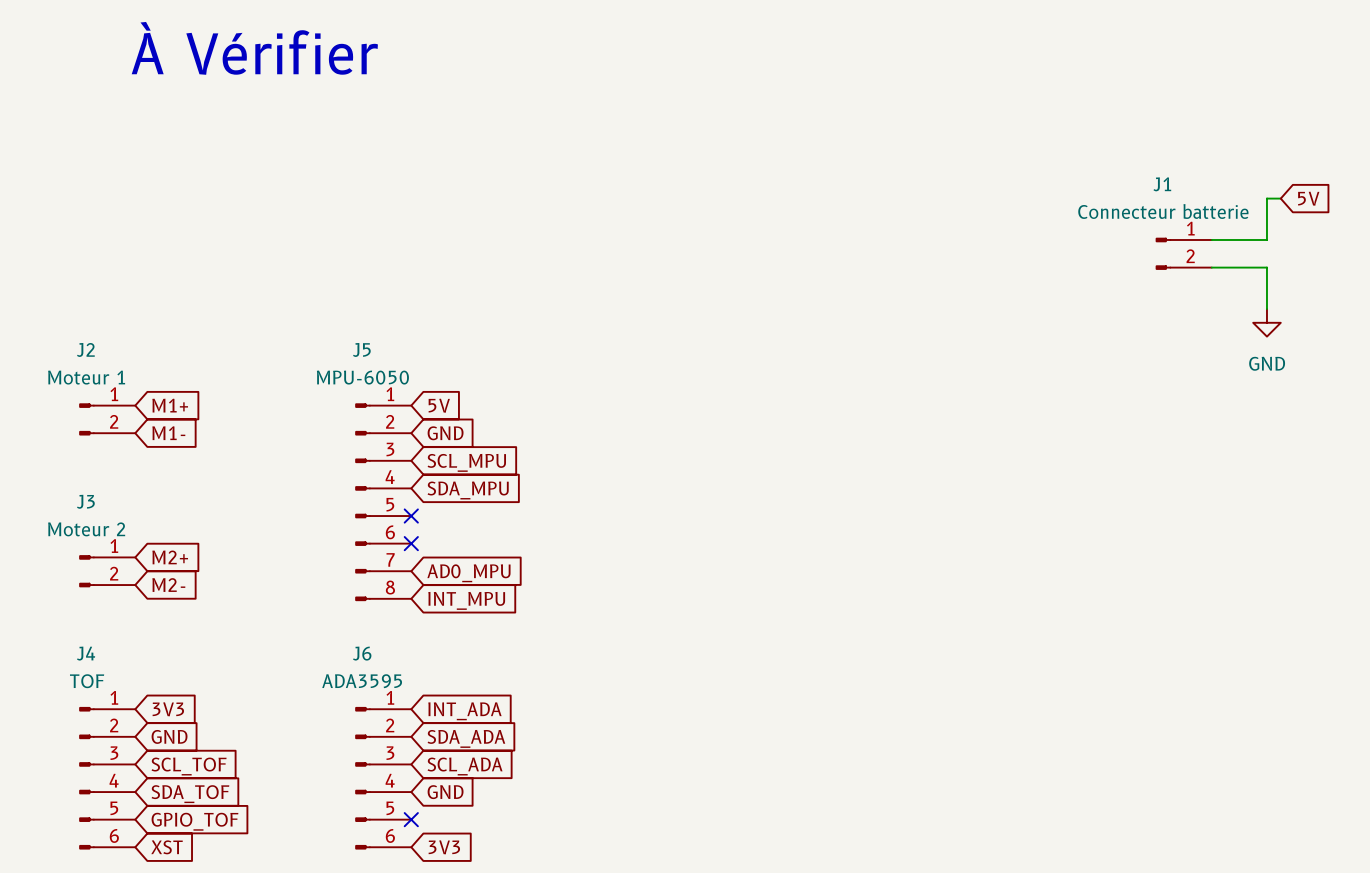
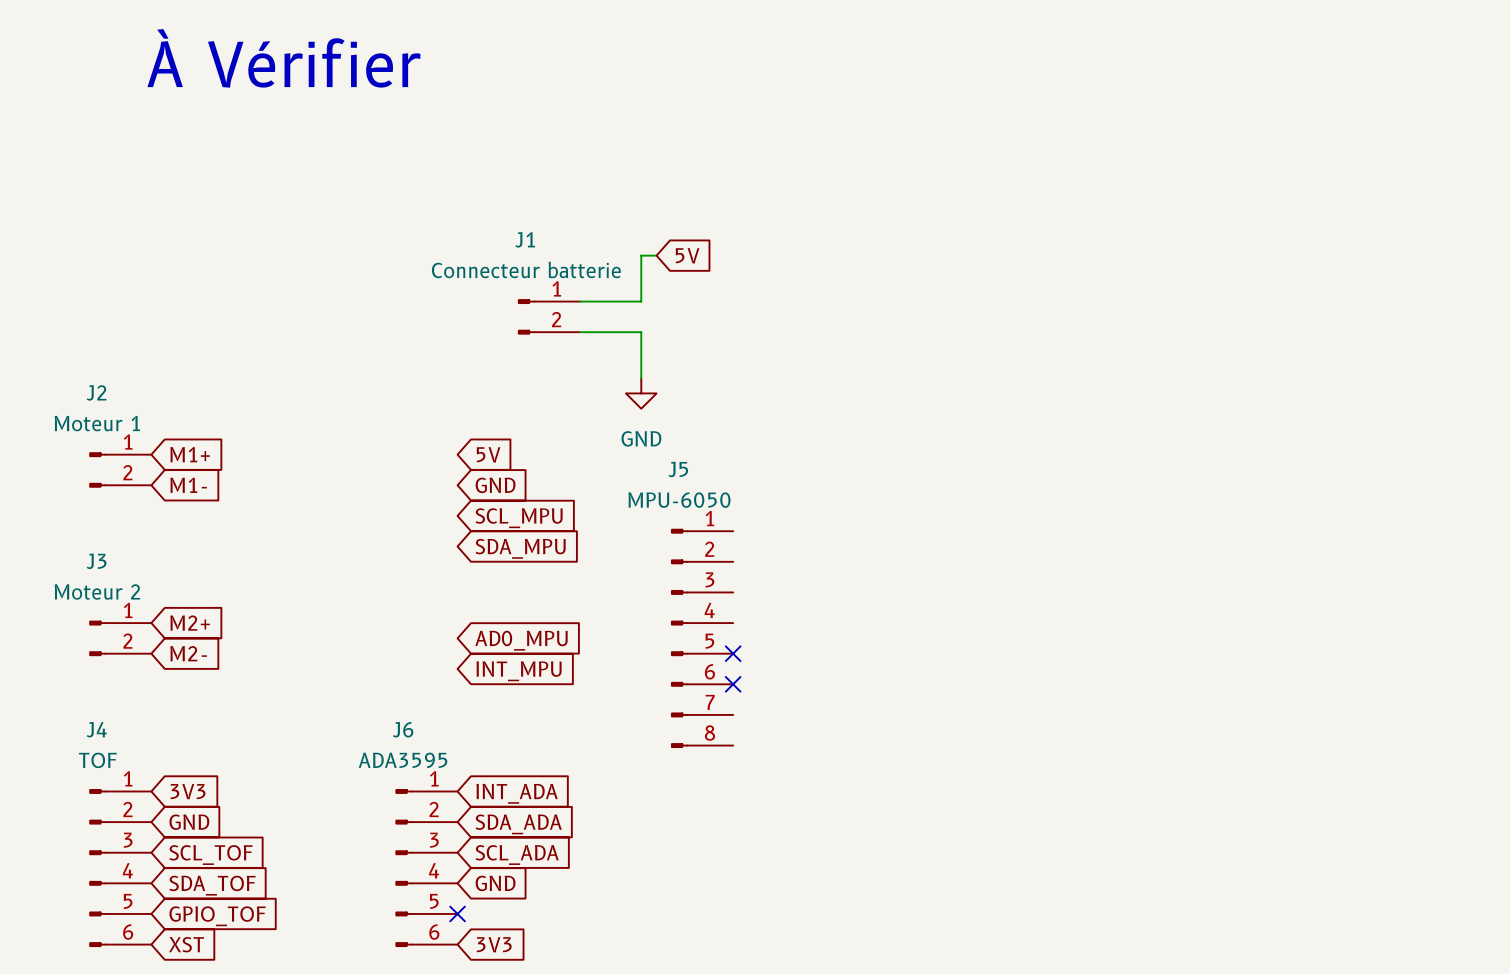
wire: (1280, 198) (1266, 198) (1266, 239) (1211, 239) -> none
global label: 5V (1308, 198) -> none
wire: none -> (656, 255) (641, 255) (641, 301) (580, 301)
global label: none -> 5V (687, 255)
J1 position: (1183, 253) -> (548, 316)
wire: (1211, 267) (1266, 267) (1266, 309) -> none
wire: none -> (580, 332) (641, 332) (641, 378)
power symbol: GND (1266, 322) -> none
power symbol: none -> GND (641, 393)
J5 position: (383, 502) -> (702, 638)
no-connect mark: (411, 516) -> none
no-connect mark: (411, 543) -> none
no-connect mark: none -> (733, 653)
no-connect mark: none -> (733, 684)

